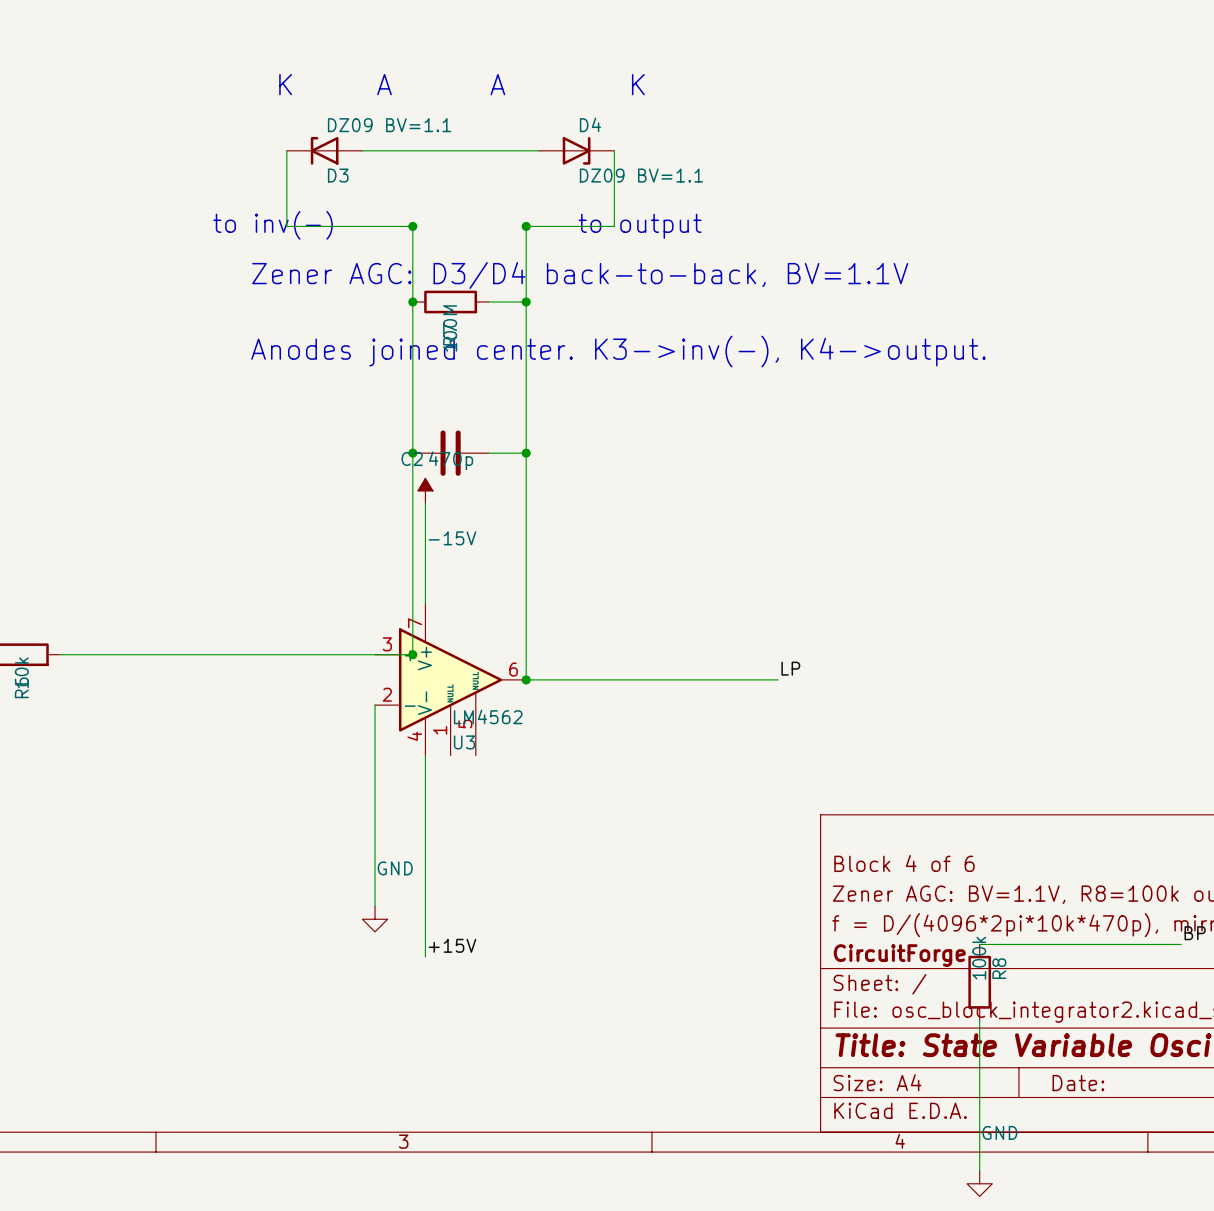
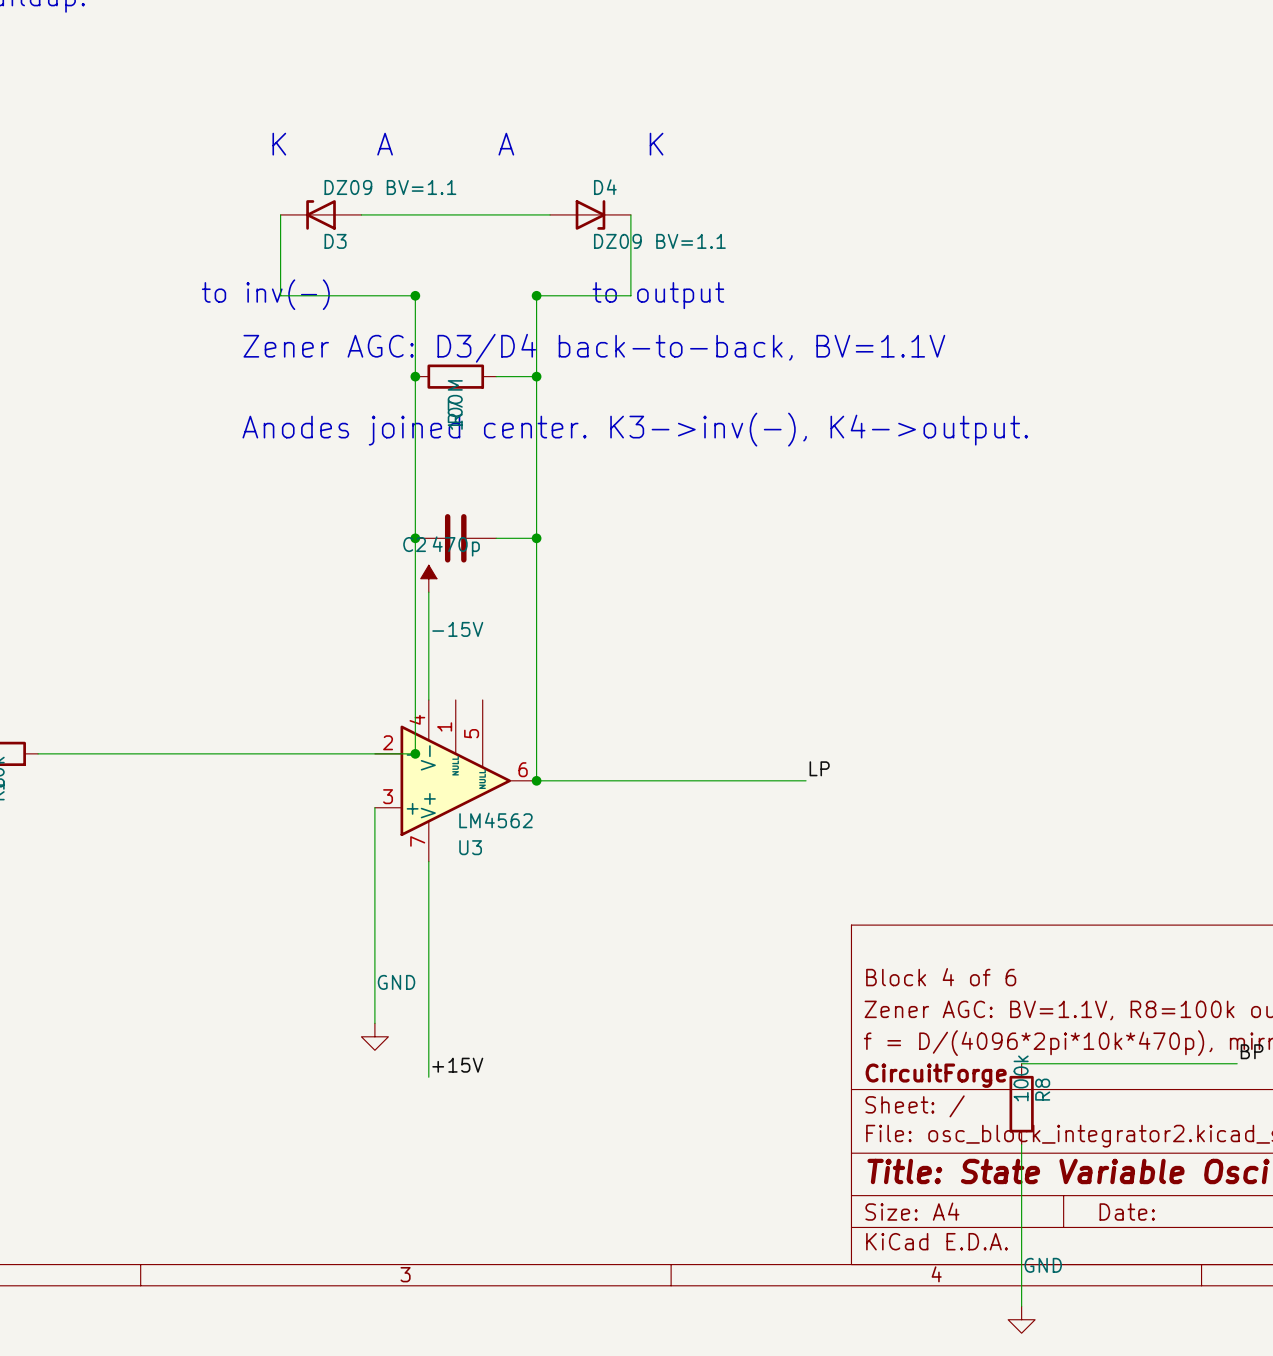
U3 flip: as is (450, 679) -> up-down (455, 780)

